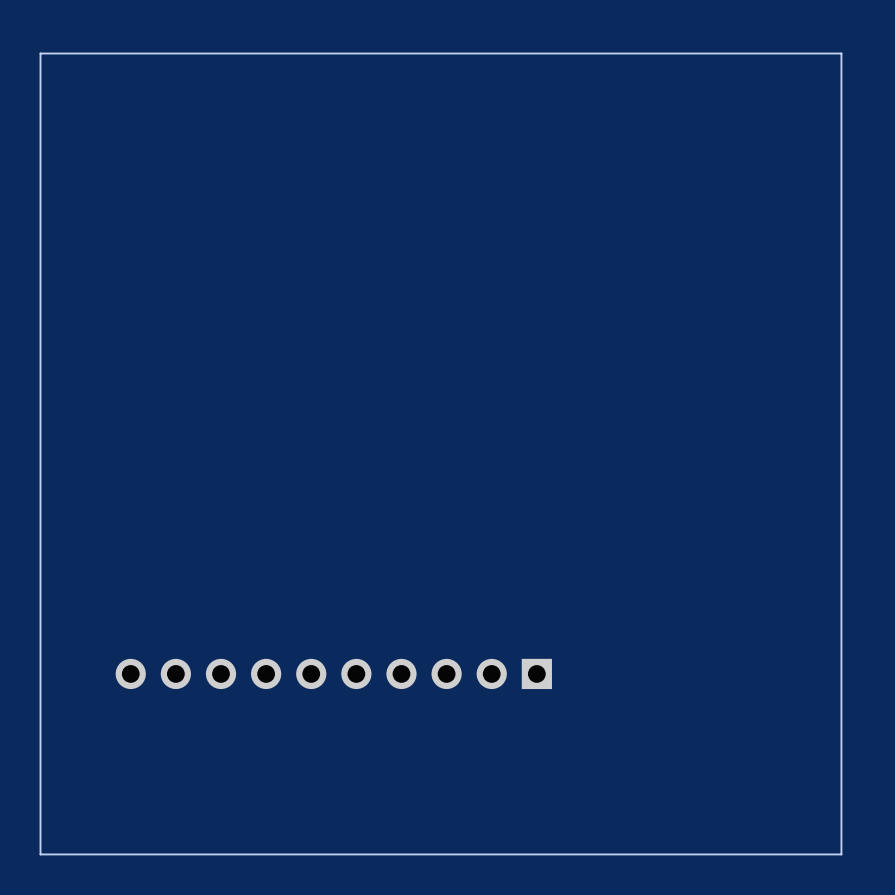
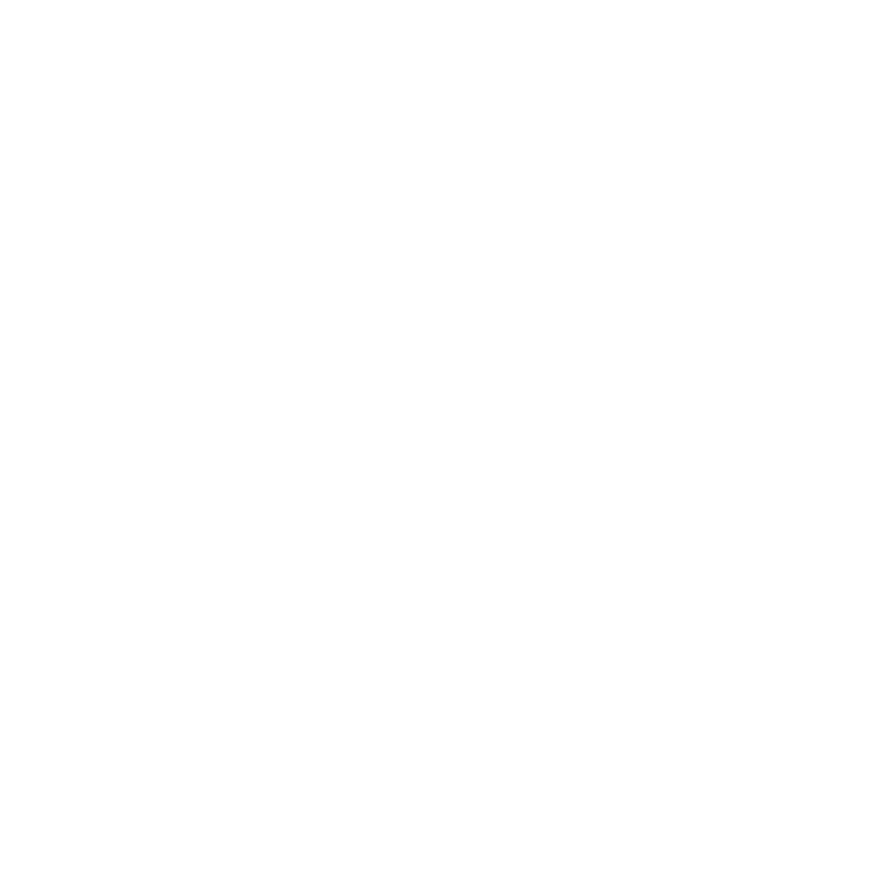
board edge: (841, 53) (40, 53) (40, 854) (841, 854) (841, 53) -> none
part: (333, 673) -> none

